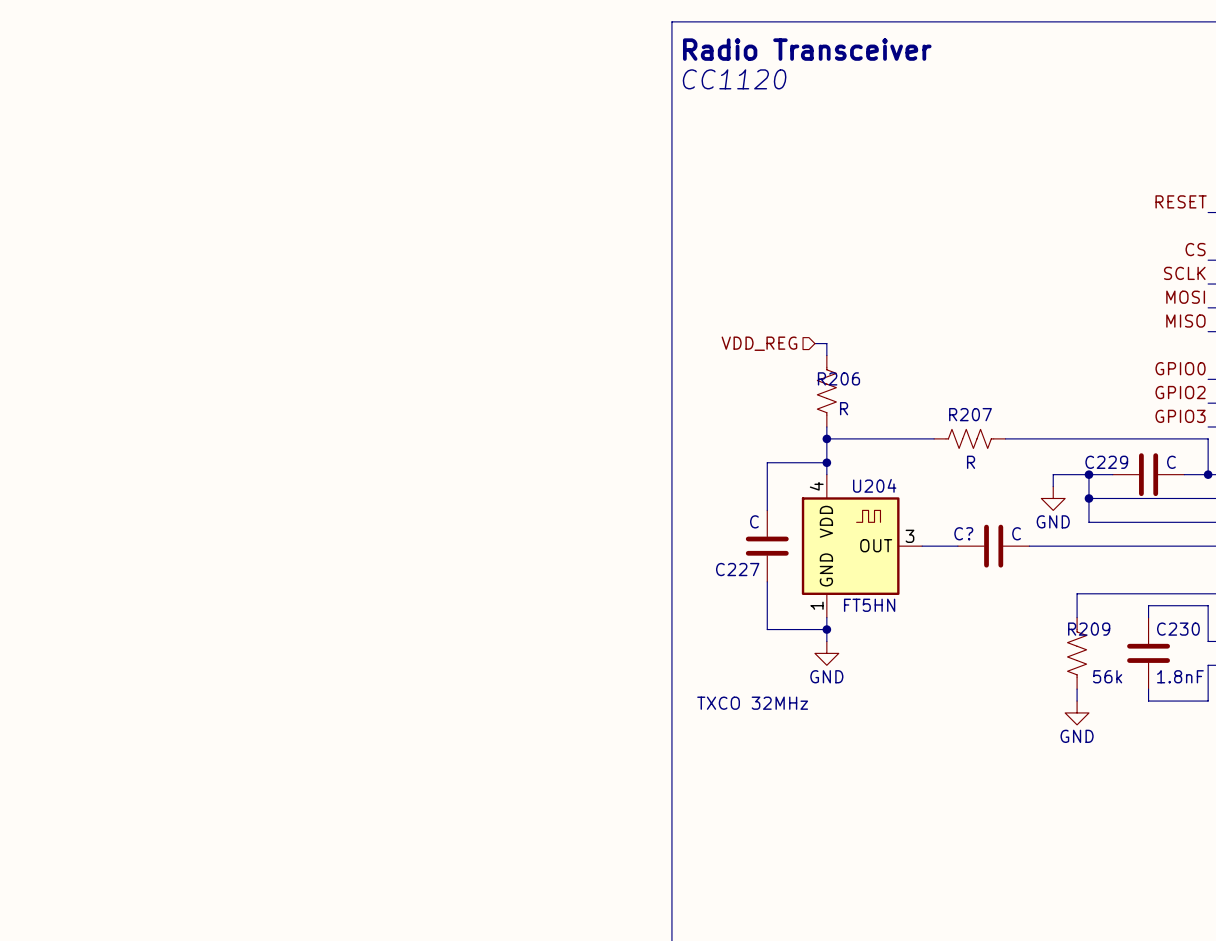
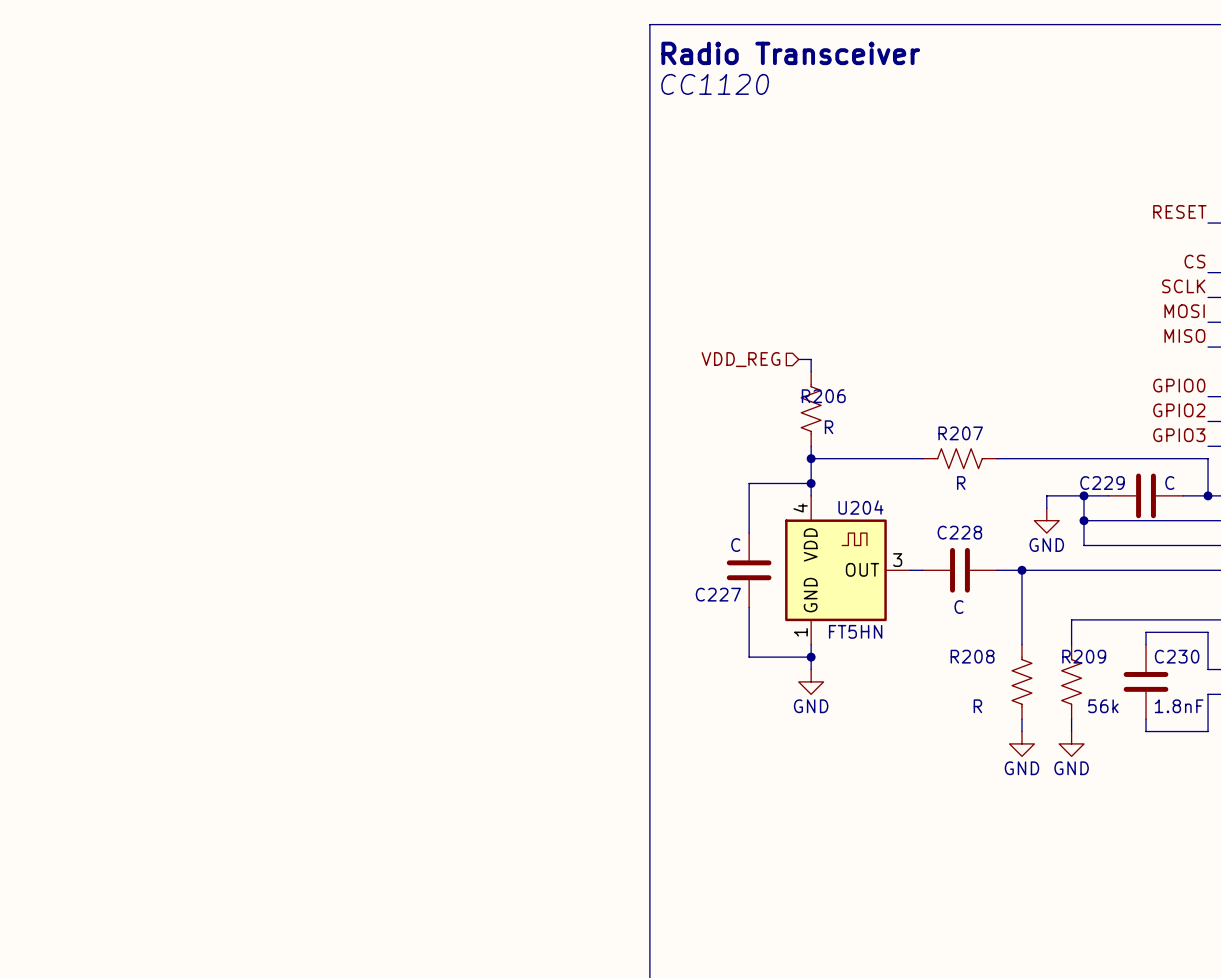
C228: none -> C (959, 570)
C?: C (993, 546) -> none
wire: none -> (997, 570) (1021, 570) (1021, 644)
junction: none -> (1021, 570)
R208: none -> R (1021, 681)
wire: none -> (1021, 719) (1021, 731)
text: TXCO 32MHz (752, 703) -> none
power symbol: none -> GND (1021, 743)

